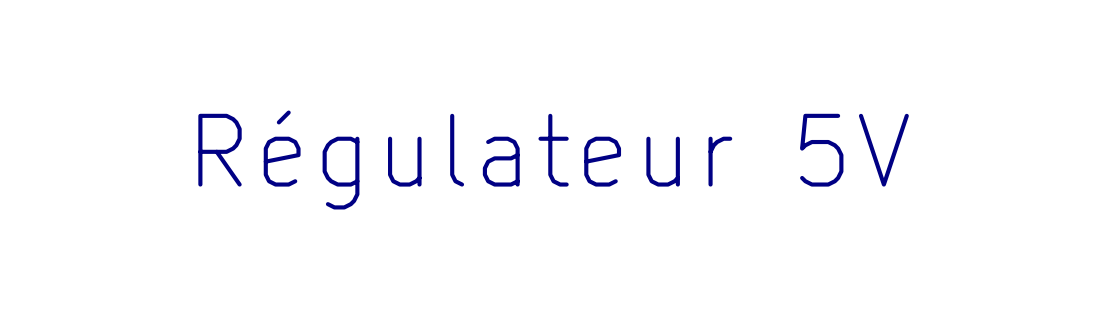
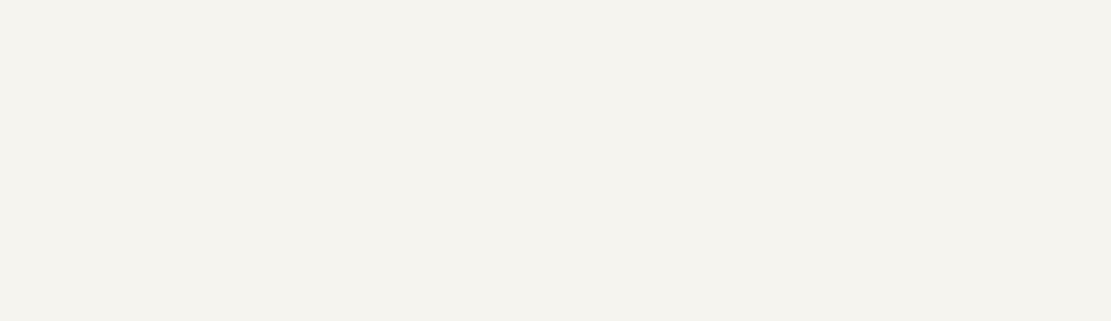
text: Régulateur 5V (553, 160) -> none

